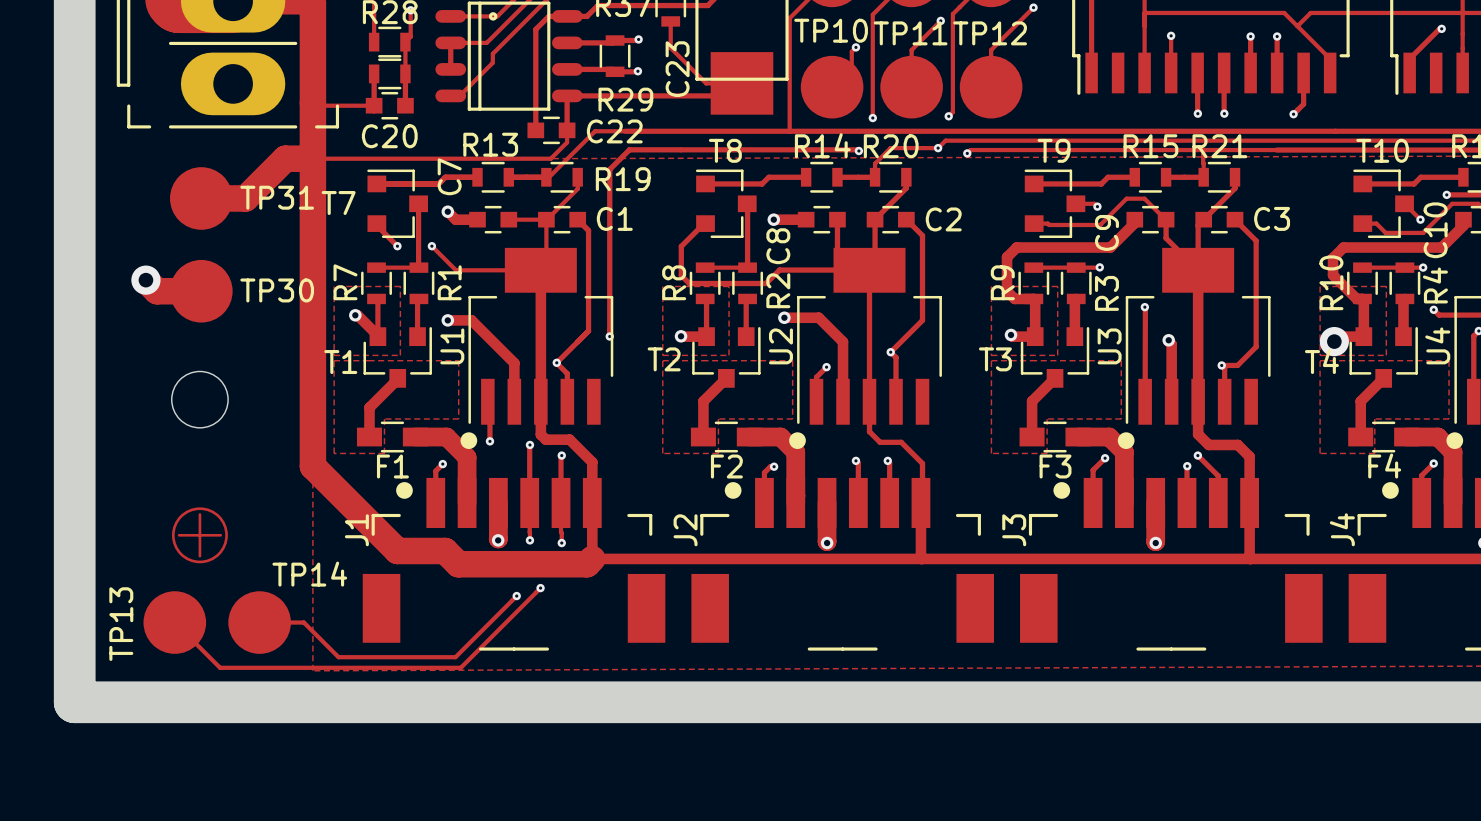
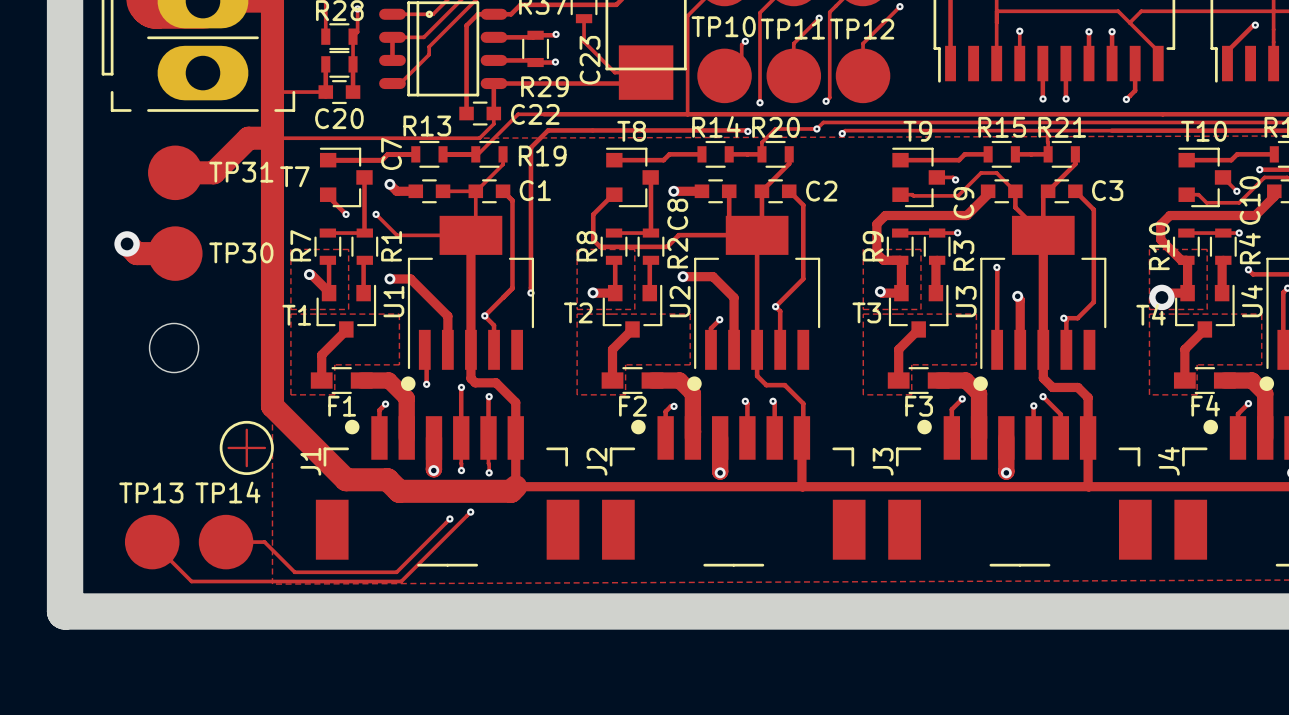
drawing: none -> [219, 420, 274, 476]
drawing: [171, 507, 228, 564] -> none
TP14 name position: TP14 (309, 574) -> TP14 (227, 492)
TP13 name rotation: 0° (121, 624) -> 90° clockwise (151, 492)

